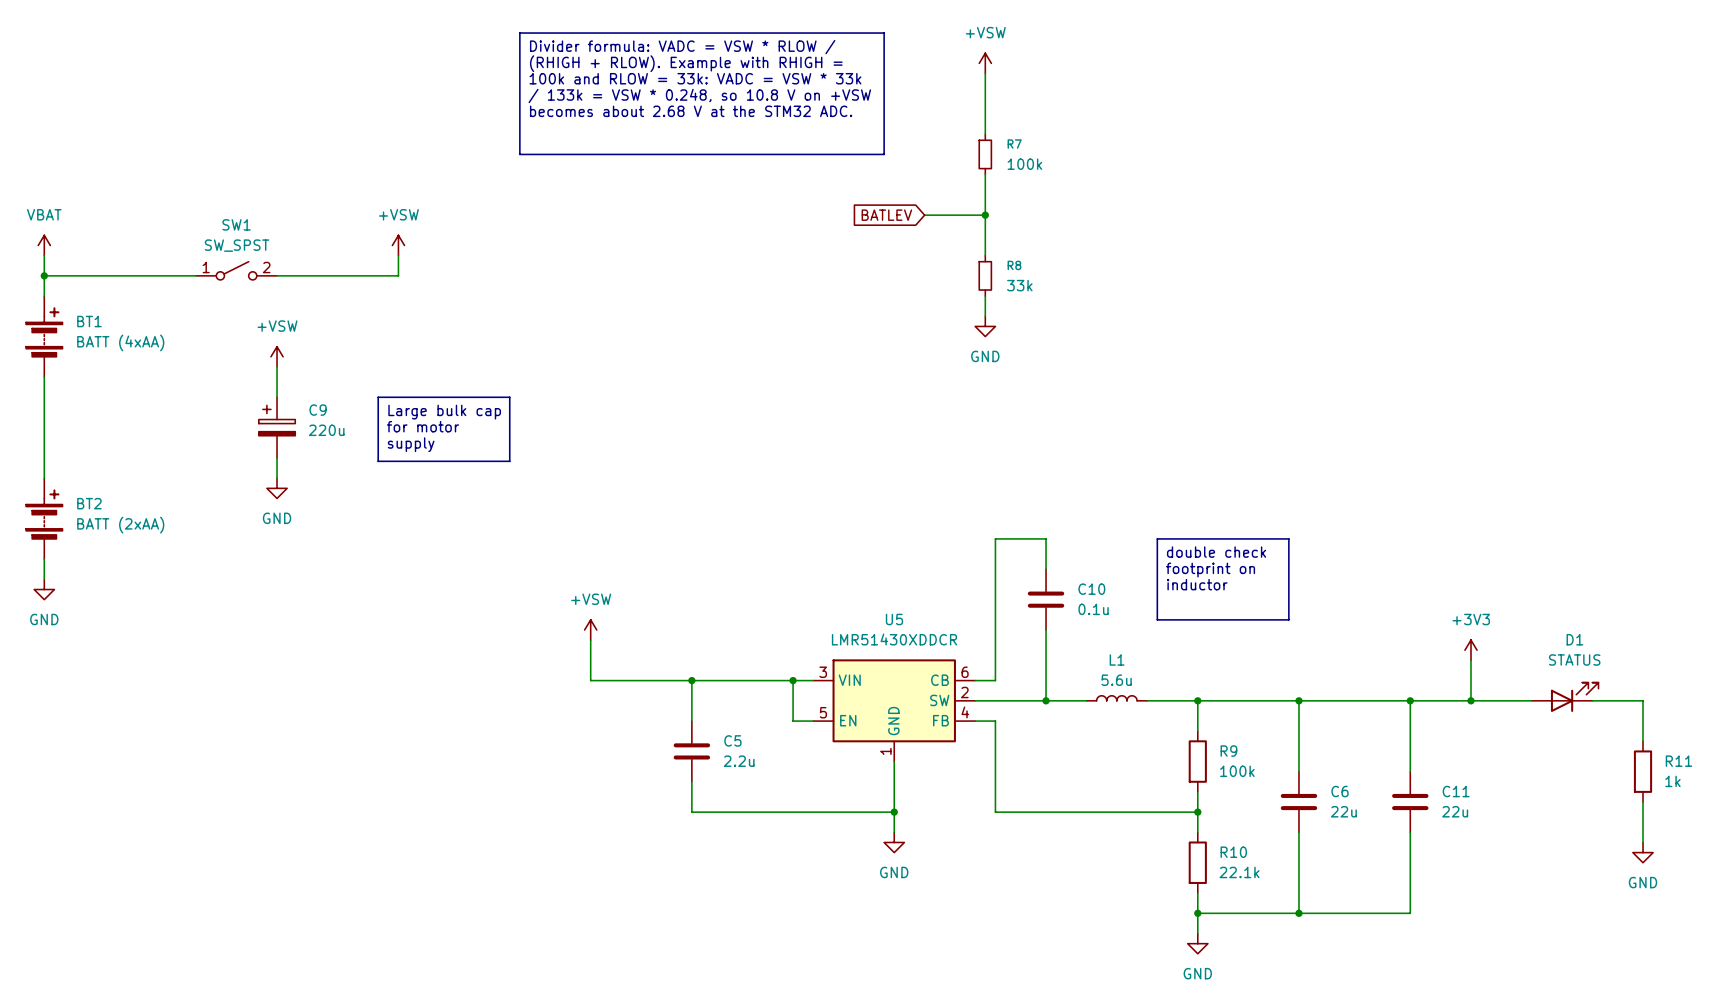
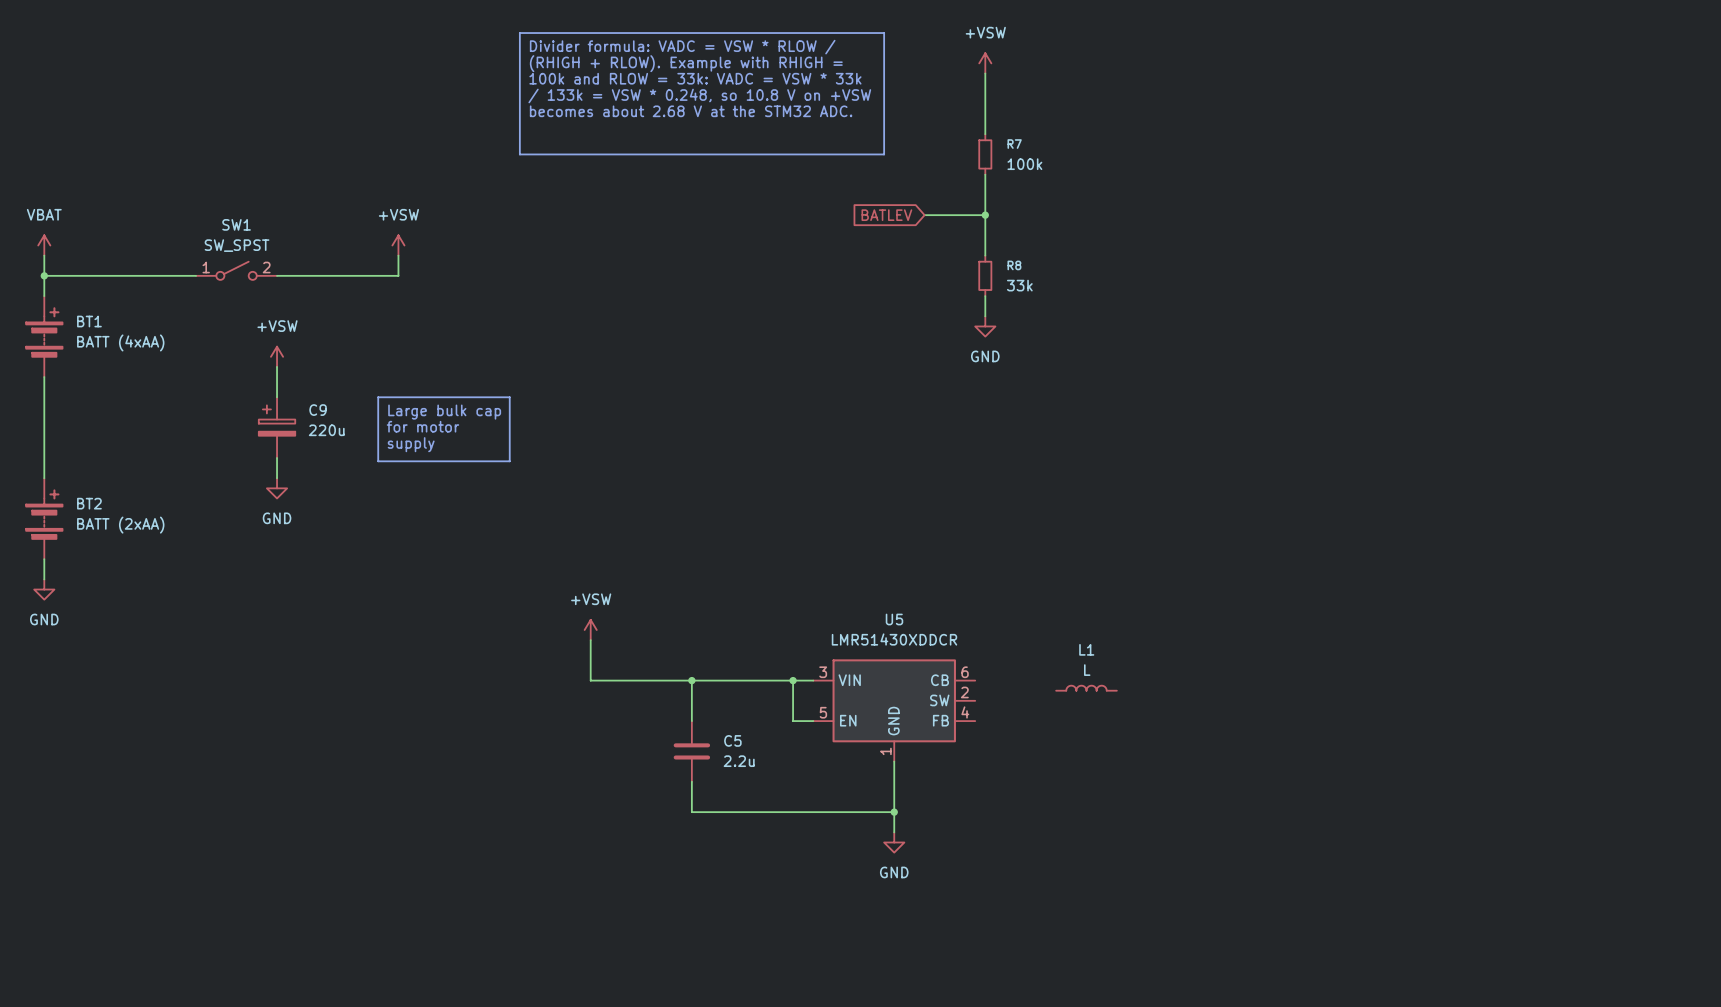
line: (1157, 538) (1288, 538) (1288, 619) (1157, 619) (1157, 538) -> none
text: double check (1216, 552) -> none
wire: (1046, 569) (1046, 538) (995, 538) (995, 680) (975, 680) -> none
text: footprint on (1210, 570) -> none
text: inductor (1197, 584) -> none
C10: 0.1u (1046, 599) -> none
wire: (1046, 630) (1046, 700) -> none
power symbol: +3V3 (1470, 650) -> none
wire: (1470, 660) (1470, 700) -> none
L1 value: 5.6u (1116, 680) -> L (1087, 670)
D1: STATUS (1565, 697) -> none
L1 position: (1116, 698) -> (1086, 688)
wire: (975, 700) (1086, 700) -> none
junction: (1046, 700) -> none
wire: (1147, 700) (1531, 700) -> none
wire: (1197, 700) (1197, 731) -> none
junction: (1197, 700) -> none
wire: (1298, 700) (1298, 771) -> none
junction: (1298, 700) -> none
wire: (1410, 700) (1410, 771) -> none
junction: (1410, 700) -> none
junction: (1470, 700) -> none
wire: (1592, 700) (1643, 700) (1643, 741) -> none
wire: (975, 721) (995, 721) (995, 812) (1197, 812) -> none
R9: 100k (1197, 761) -> none
R11: 1k (1643, 771) -> none
wire: (1197, 791) (1197, 832) -> none
C6: 22u (1298, 802) -> none
C11: 22u (1410, 802) -> none
wire: (1643, 802) (1643, 842) -> none
junction: (1197, 812) -> none
wire: (1298, 832) (1298, 913) -> none
wire: (1410, 832) (1410, 913) (1197, 913) -> none
power symbol: GND (1643, 852) -> none
R10: 22.1k (1197, 862) -> none
wire: (1197, 893) (1197, 933) -> none
junction: (1197, 913) -> none
junction: (1298, 913) -> none
power symbol: GND (1197, 943) -> none

